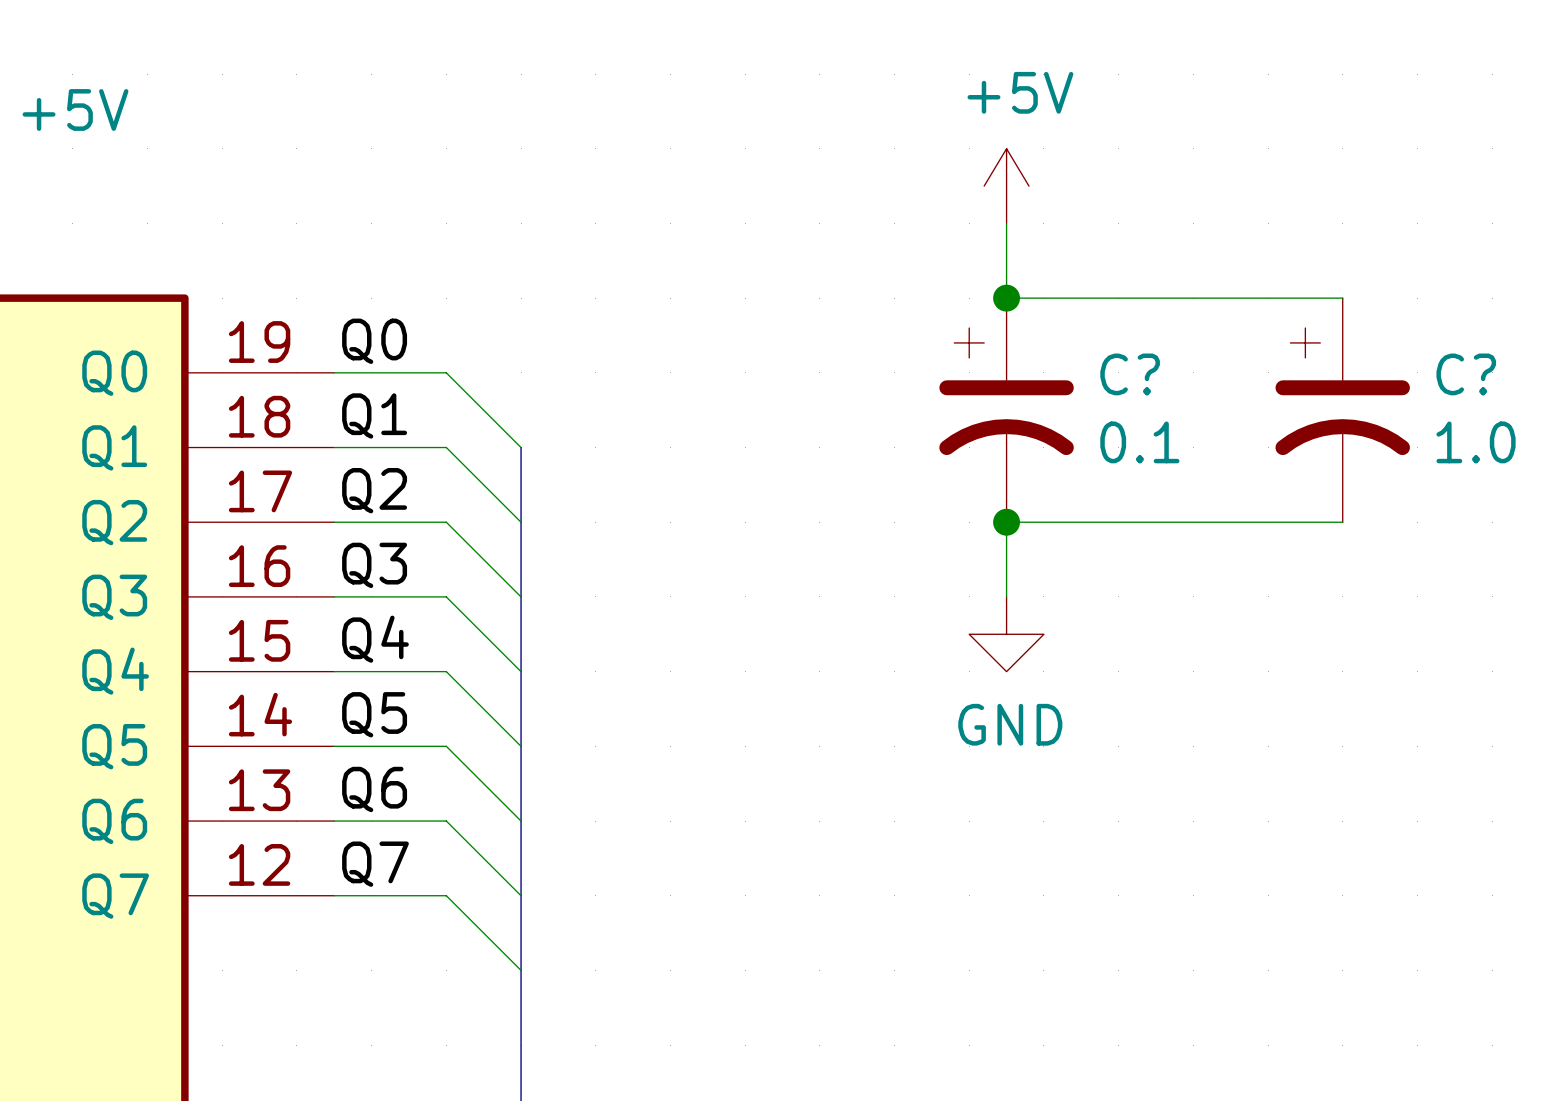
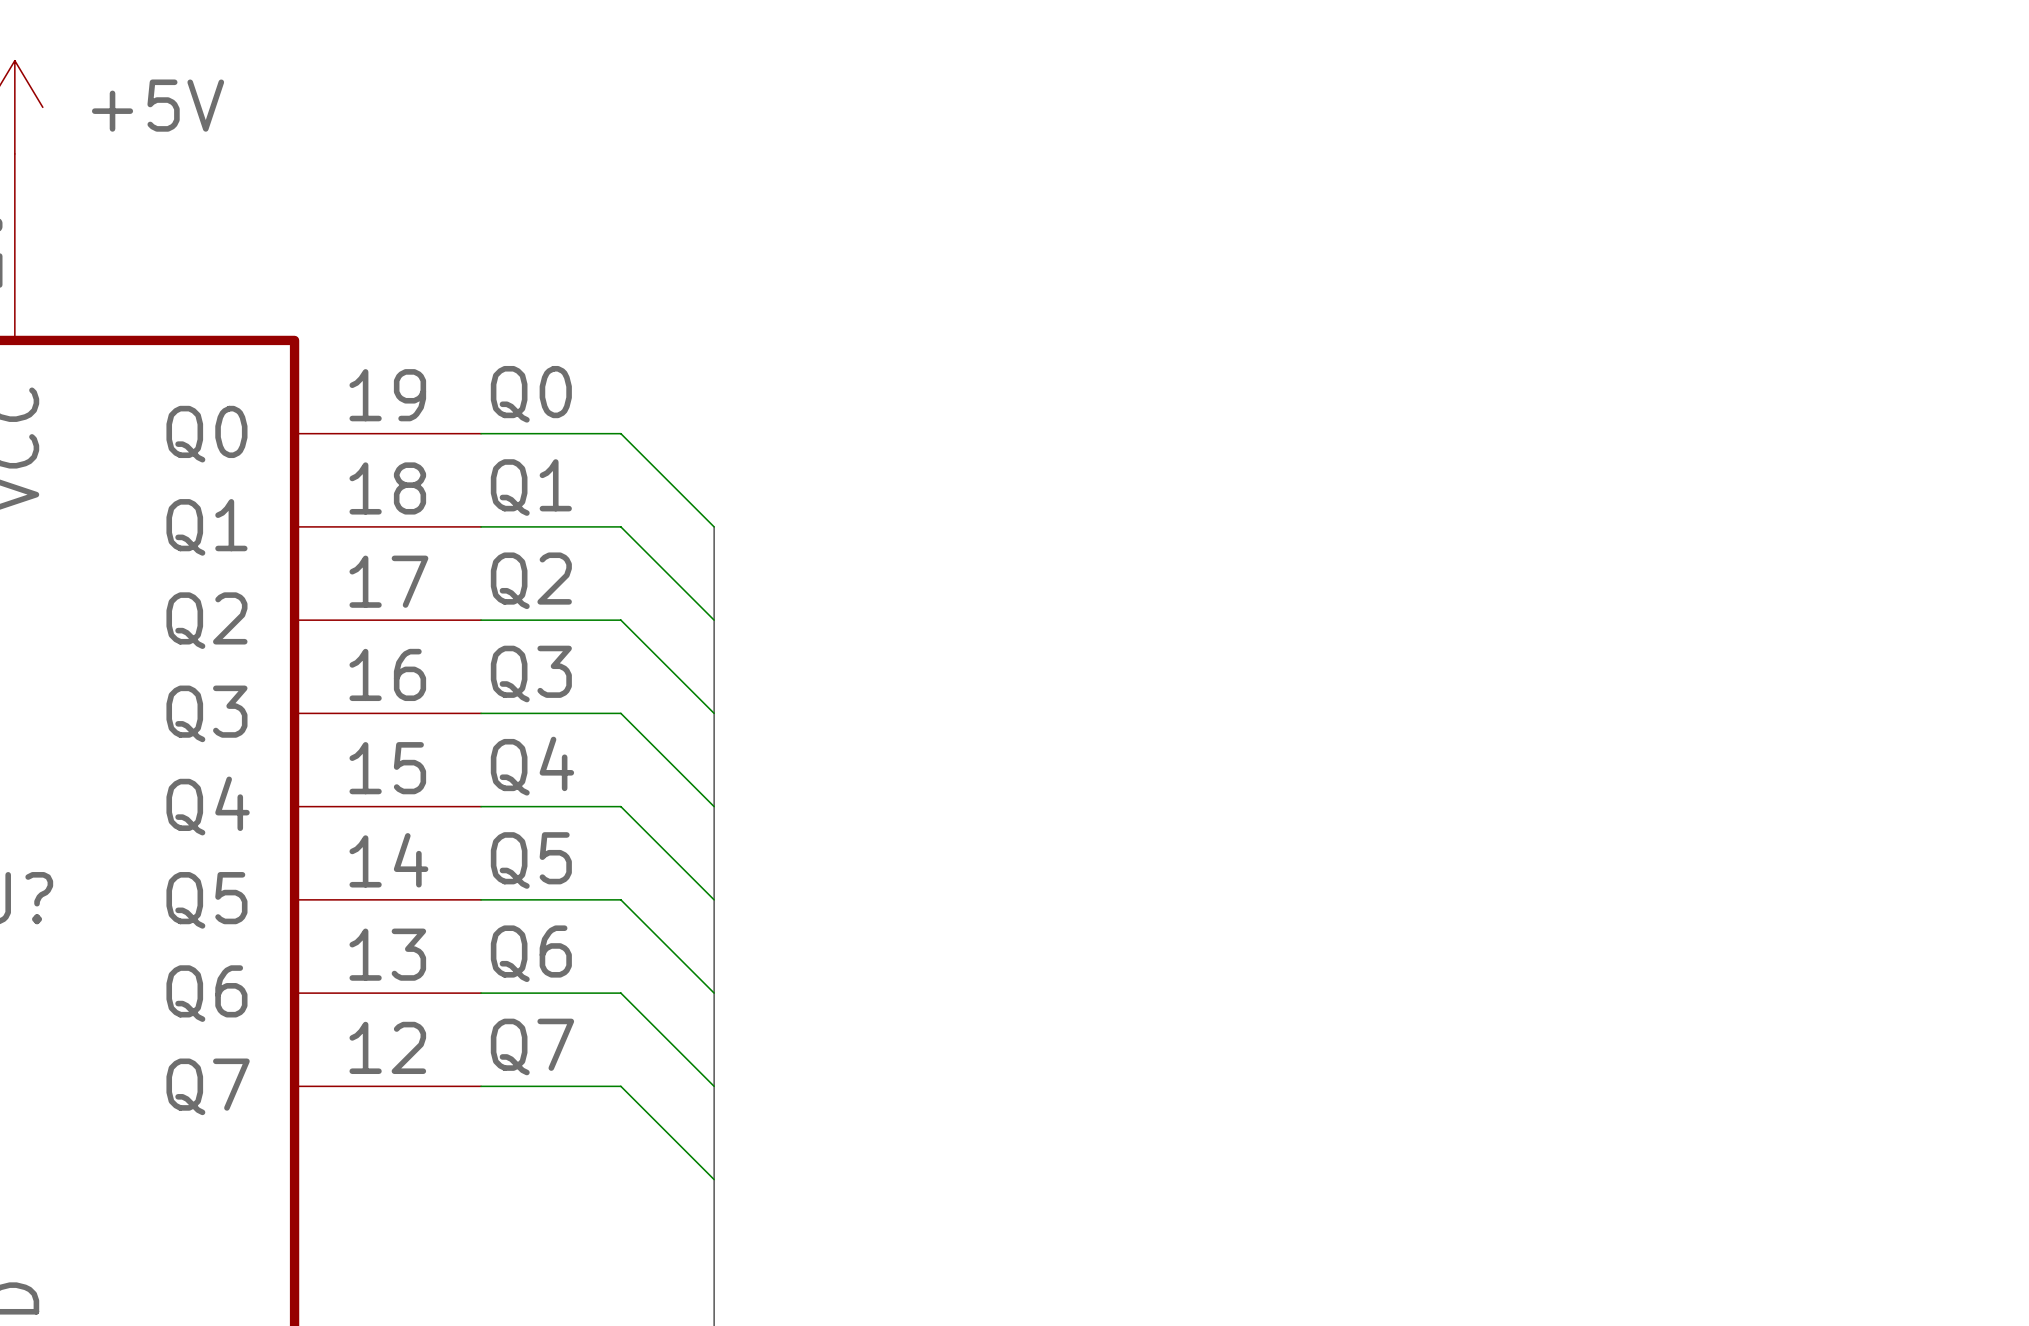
power symbol: +5V (1006, 186) -> none
wire: (1006, 223) (1006, 298) (1342, 298) -> none
junction: (1006, 298) -> none
C?: 0.1 (1006, 410) -> none
C?: 1.0 (1342, 410) -> none
junction: (1006, 522) -> none
wire: (1342, 522) (1006, 522) (1006, 596) -> none
power symbol: GND (1006, 634) -> none

